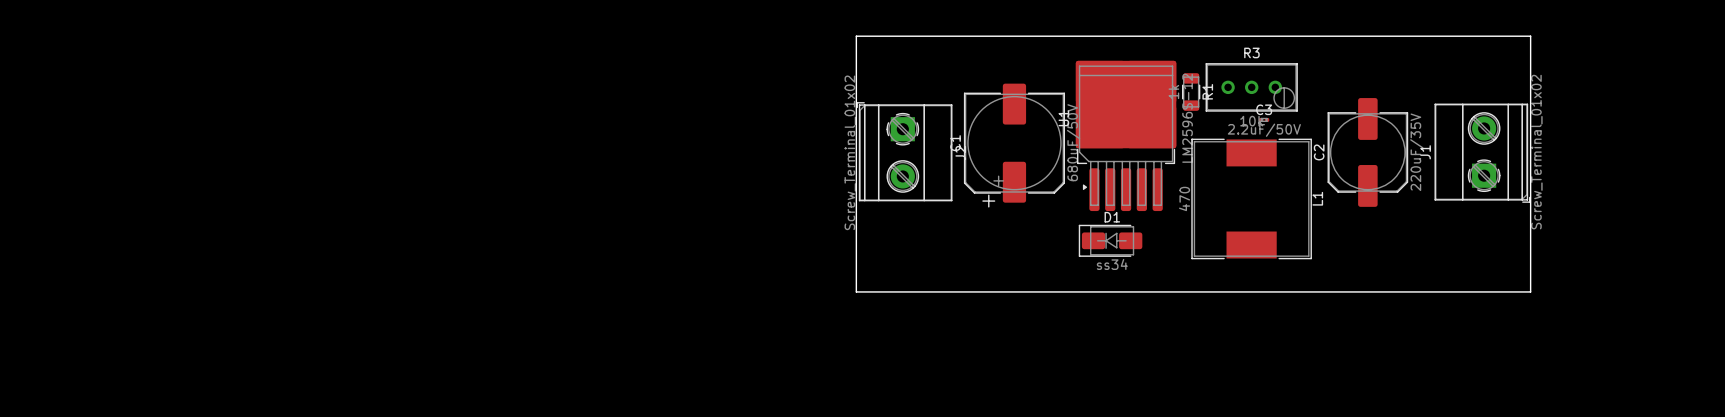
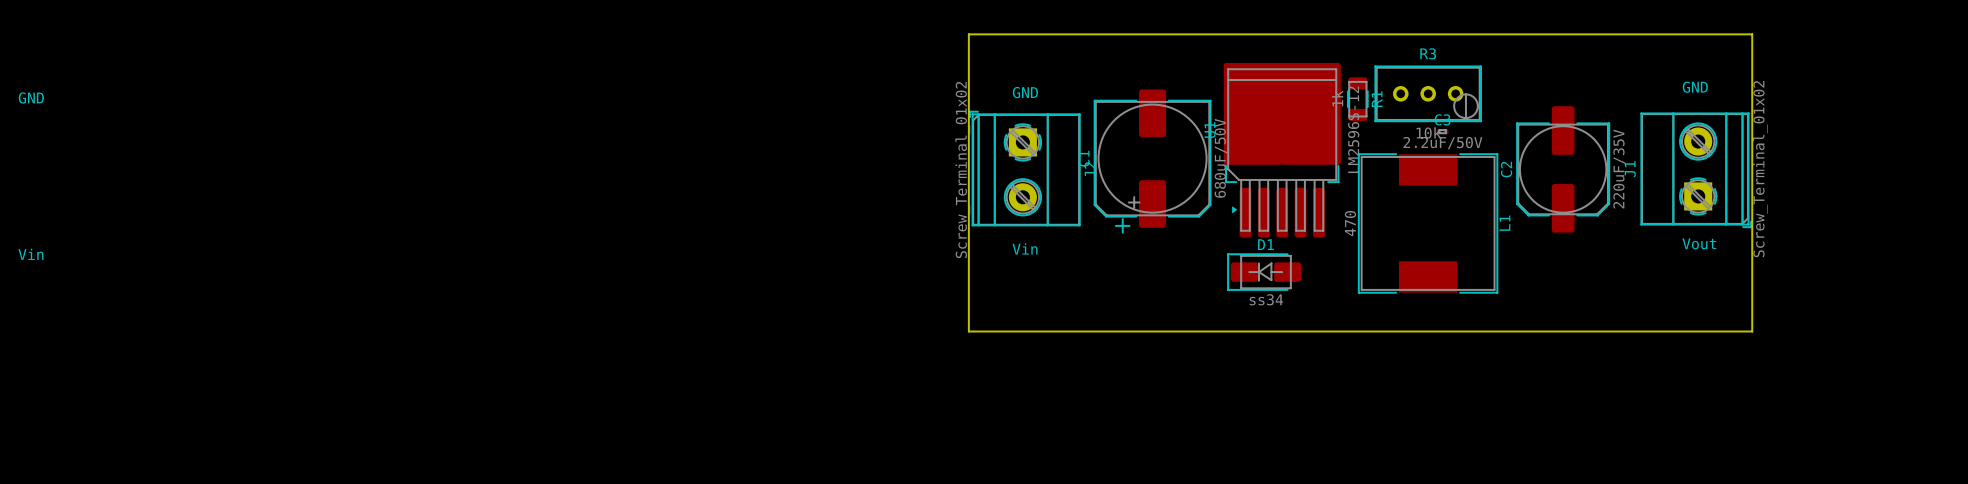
text: none -> GND (1695, 87)
text: none -> GND (1025, 92)
text: none -> GND (31, 97)
text: none -> Vout (1699, 243)
text: none -> Vin (1025, 248)
text: none -> Vin (30, 254)

